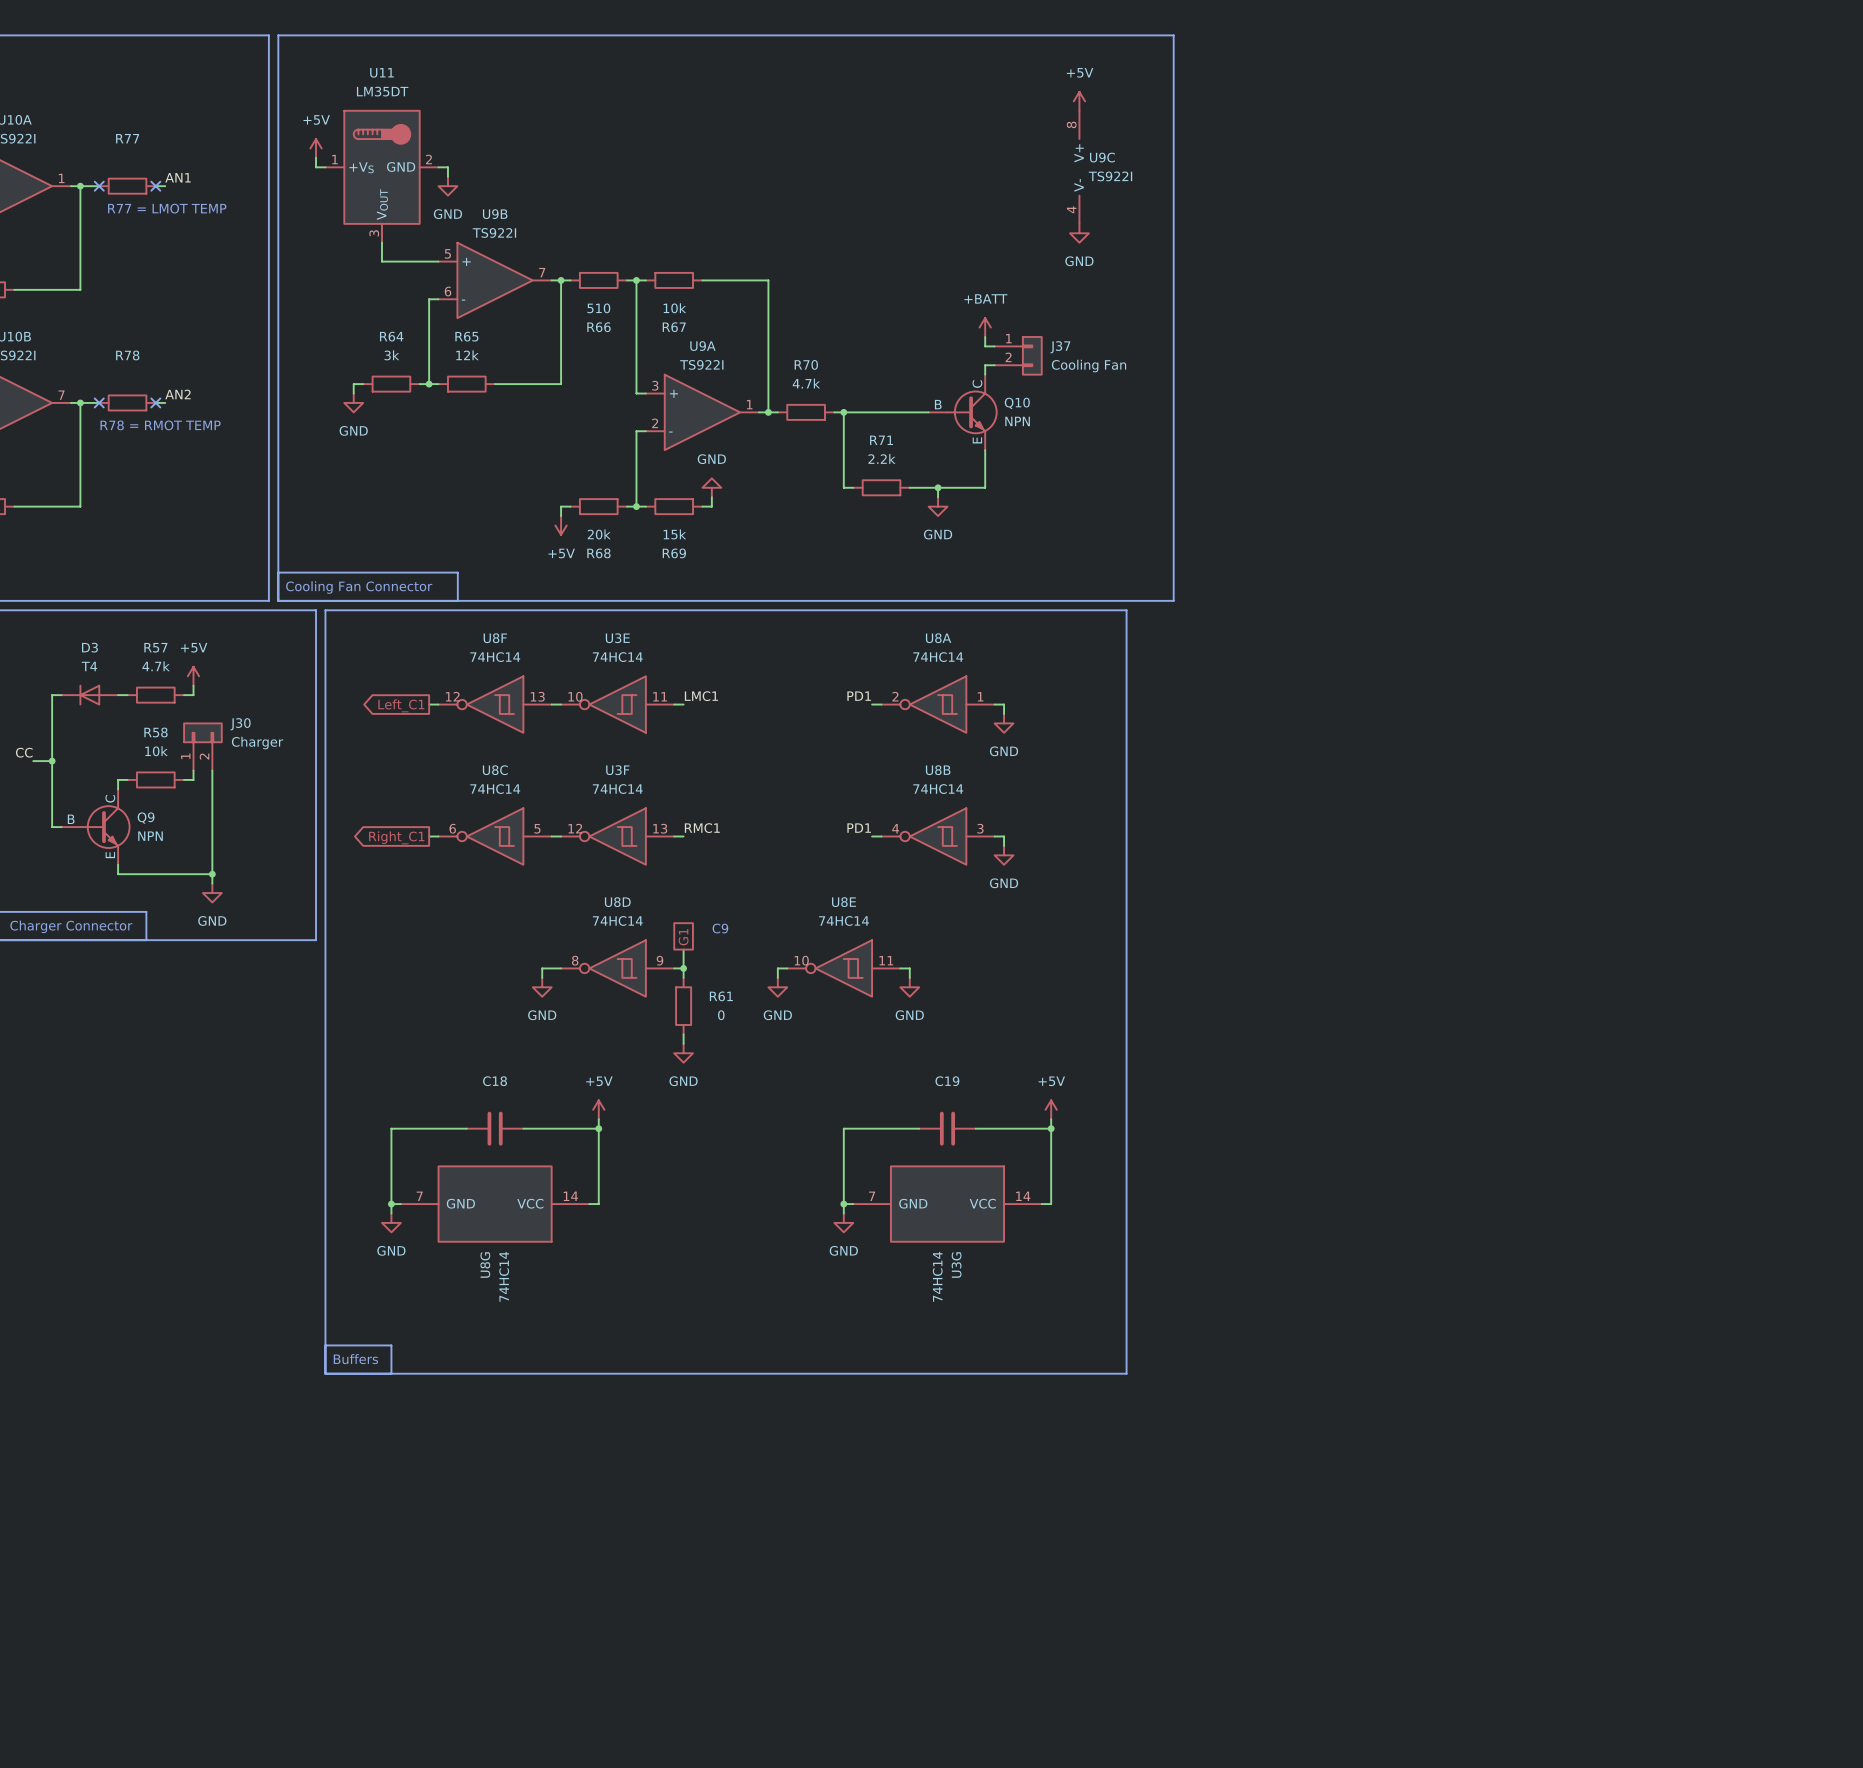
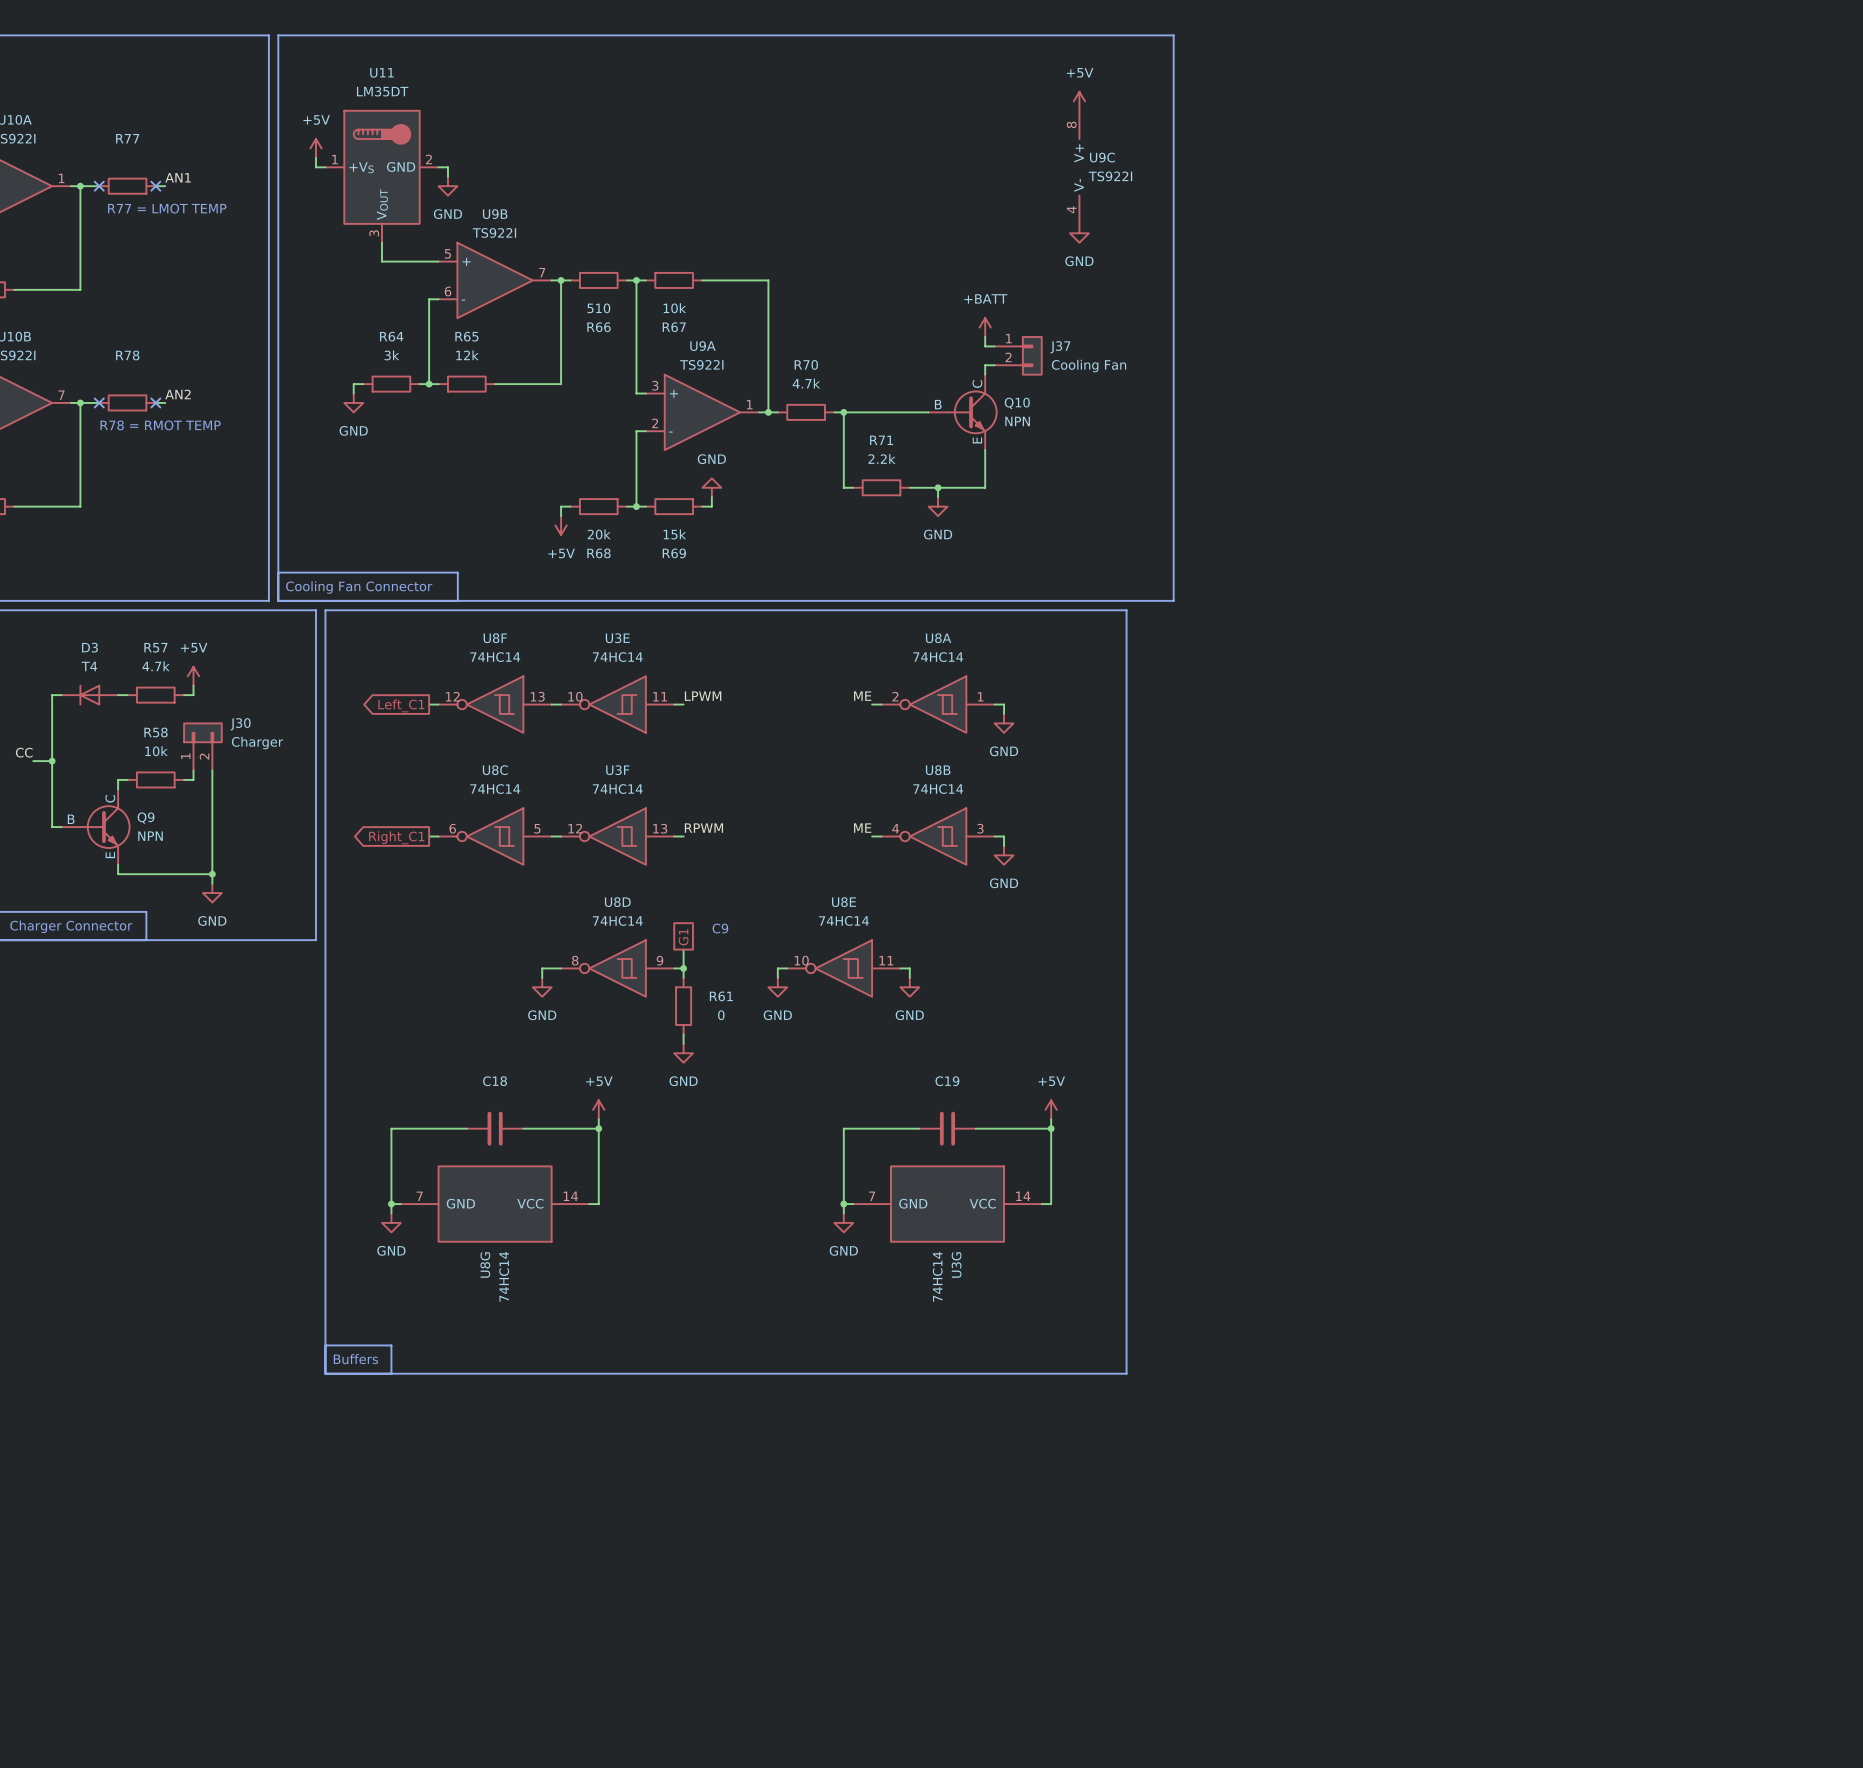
label: LMC1 (701, 696) -> LPWM (703, 696)
label: PD1 (859, 696) -> ME (862, 696)
label: RMC1 (702, 828) -> RPWM (703, 828)
label: PD1 (859, 828) -> ME (862, 828)

